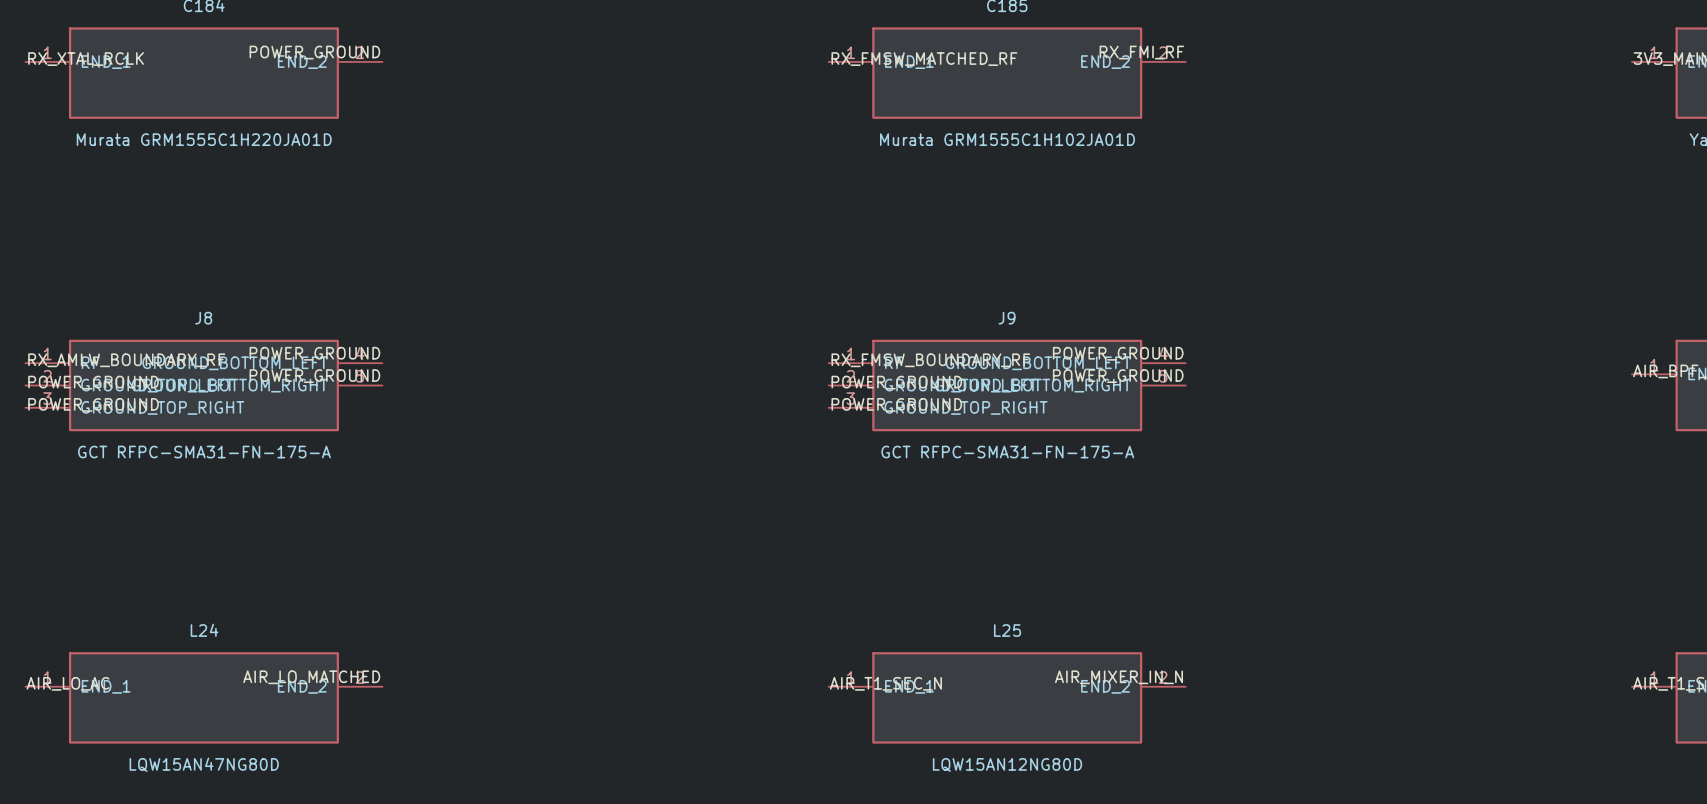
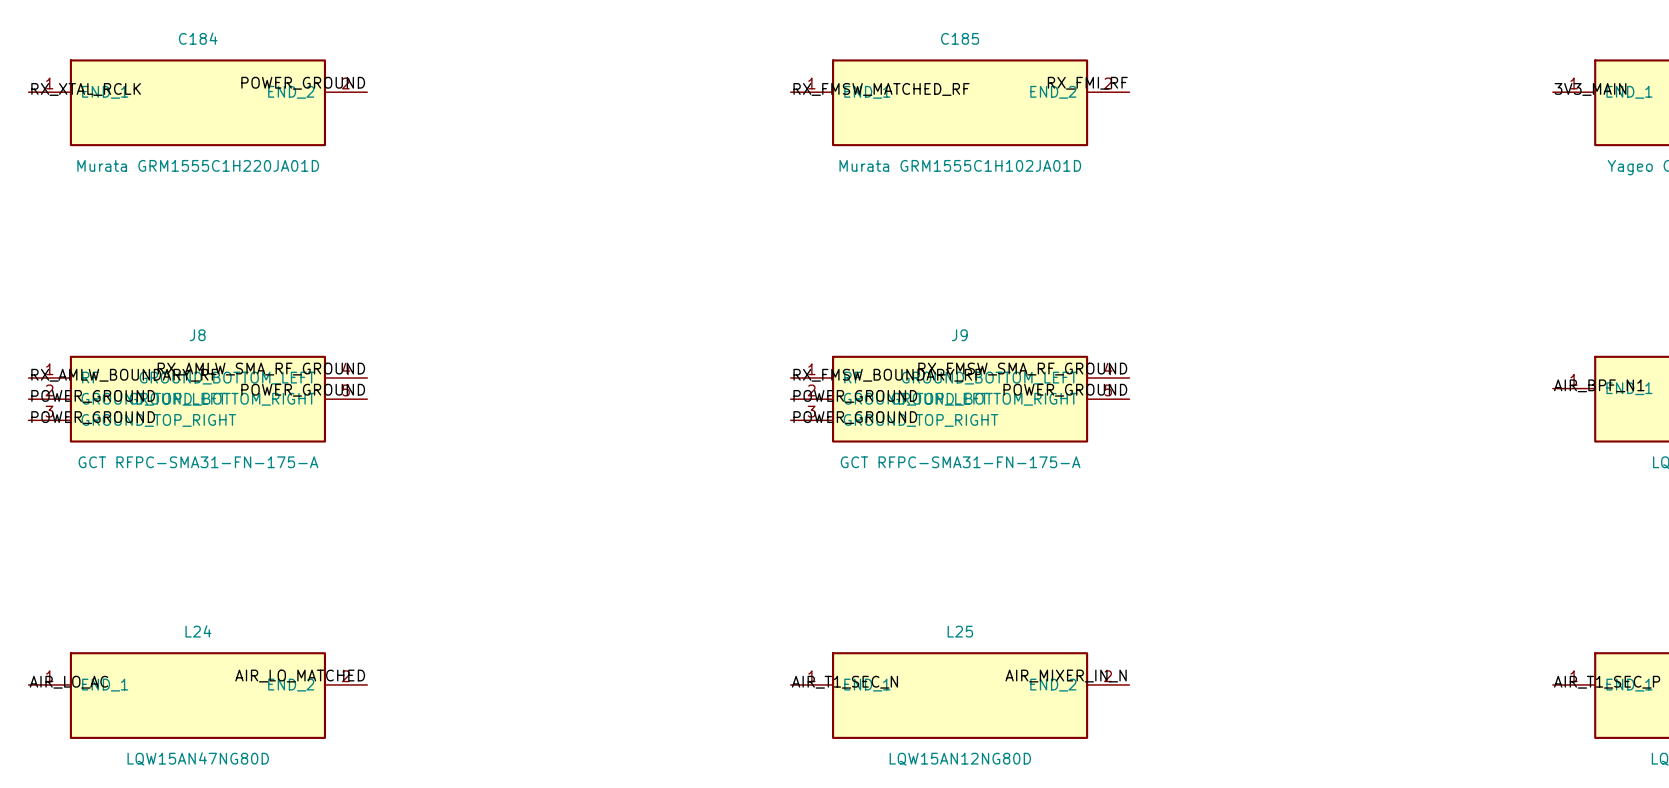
label: POWER_GROUND (314, 353) -> RX_AMLW_SMA_RF_GROUND (261, 369)
label: POWER_GROUND (1118, 353) -> RX_FMSW_SMA_RF_GROUND (1022, 369)

